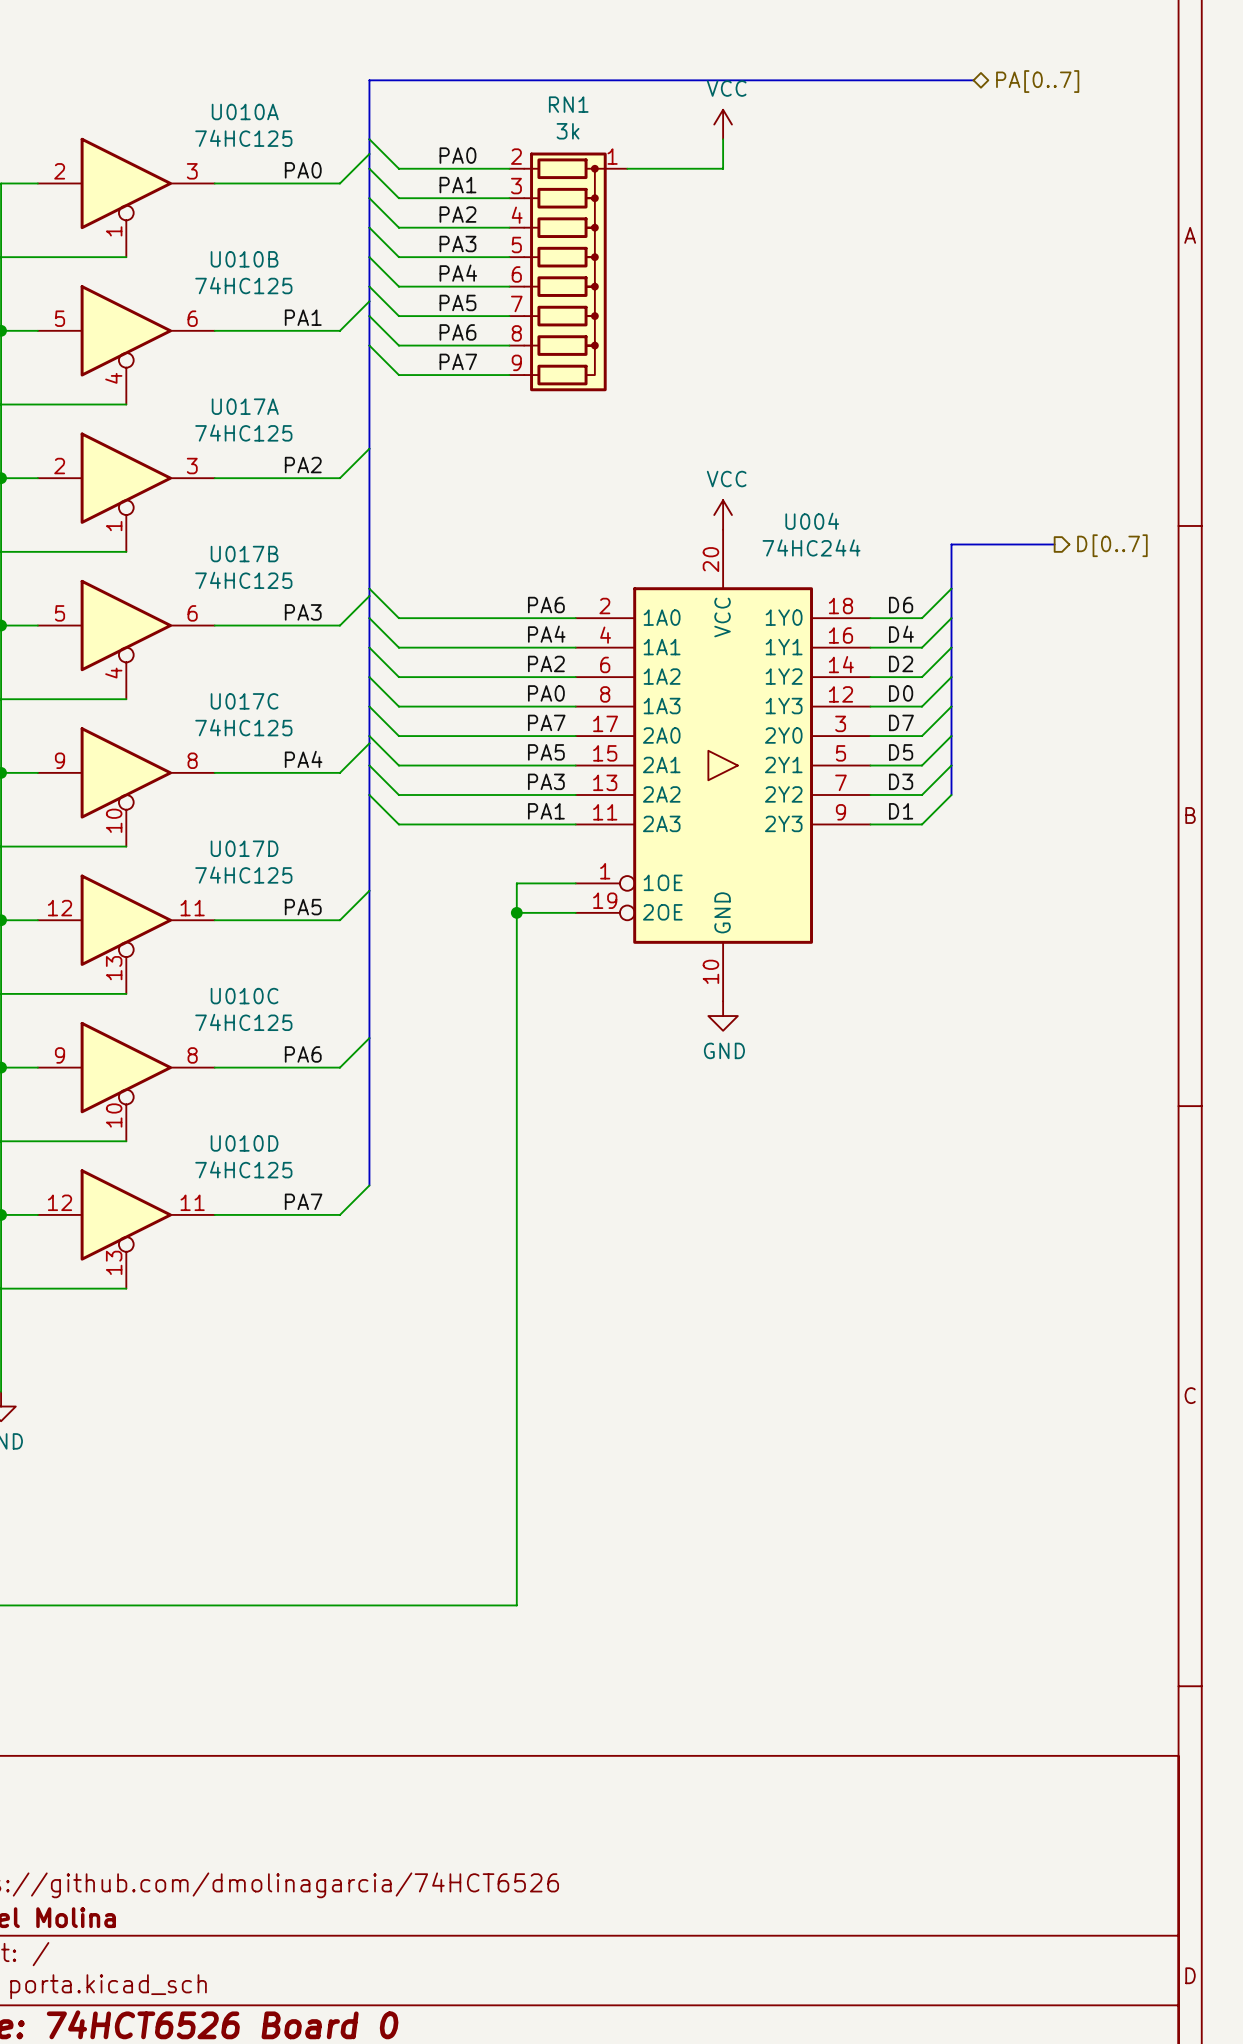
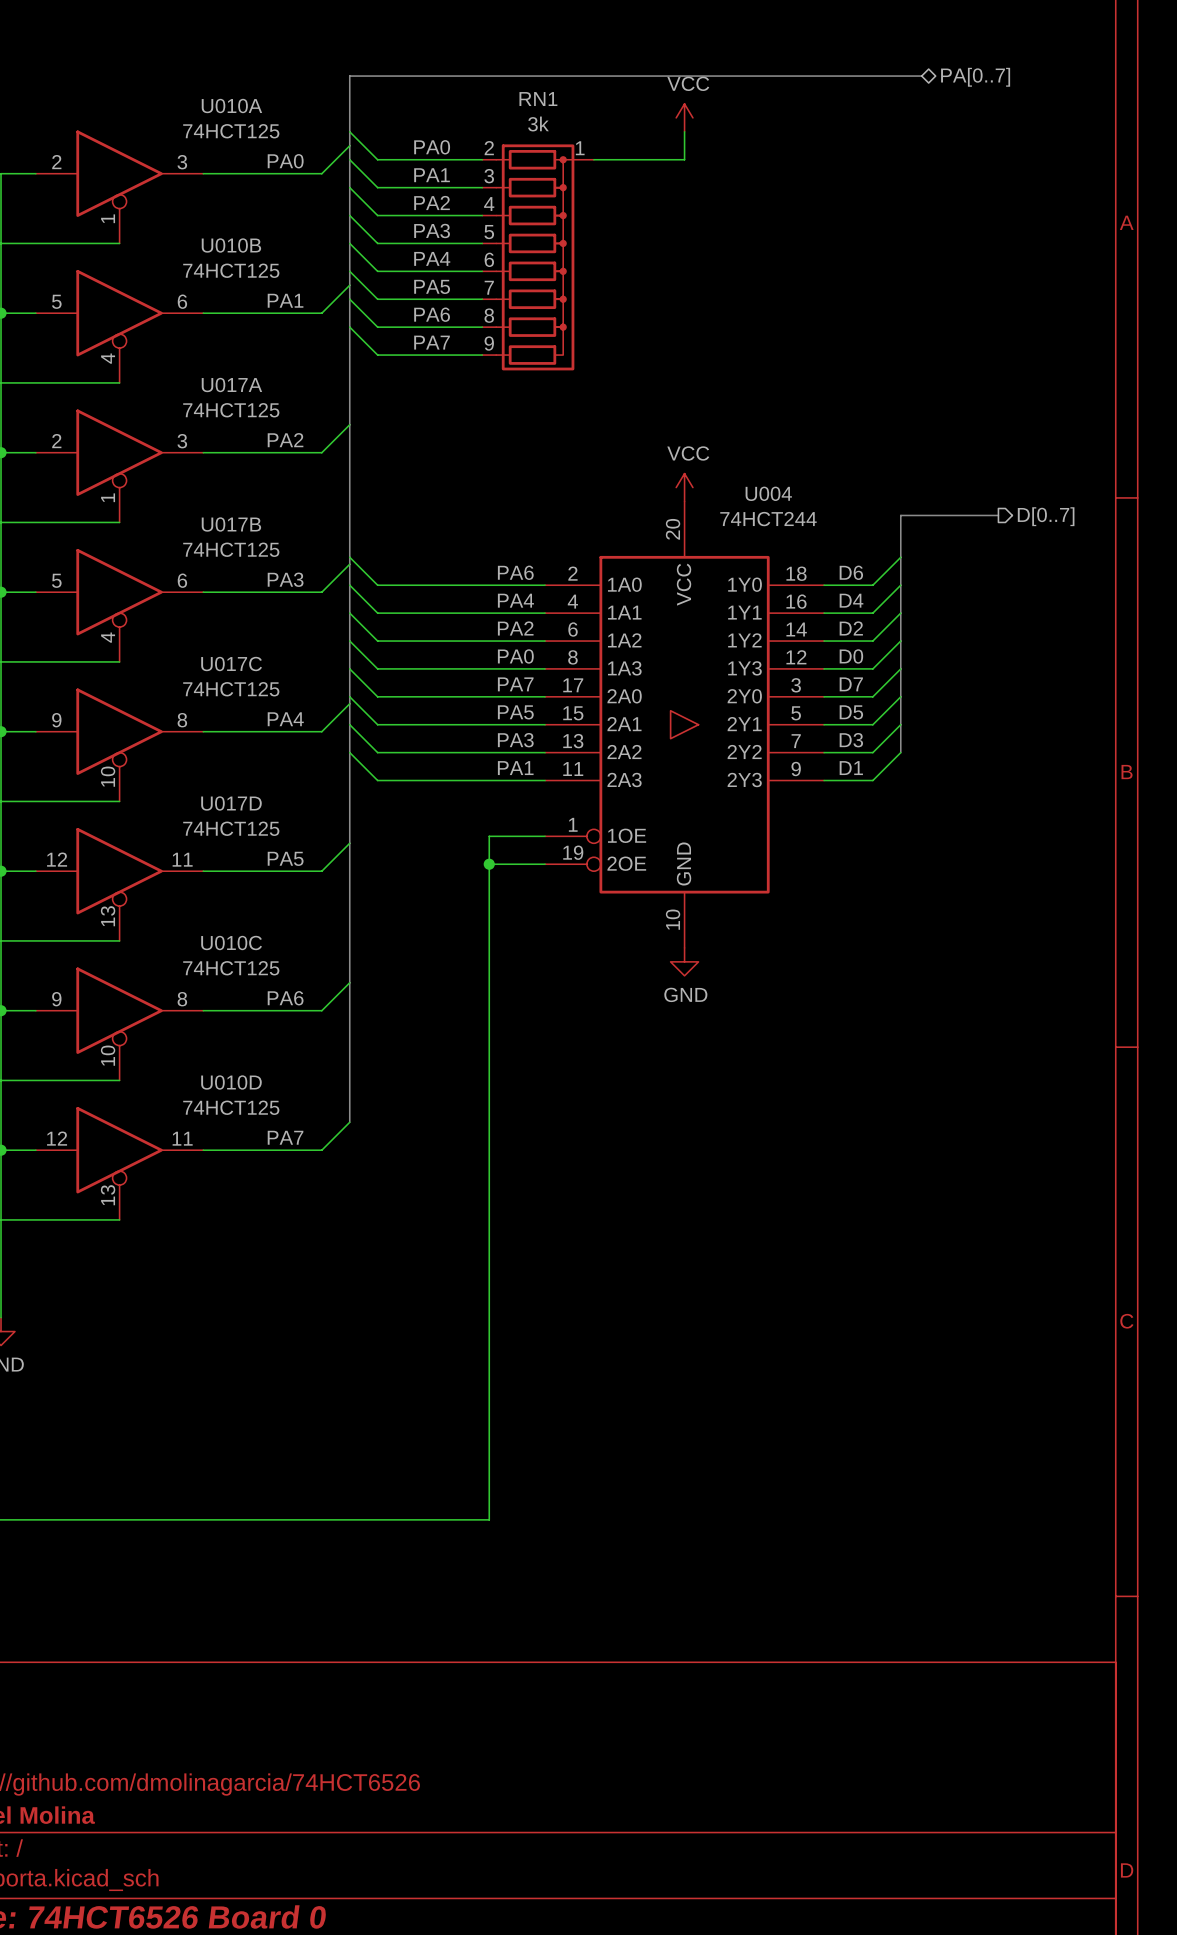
U010A value: 74HC125 (243, 138) -> 74HCT125 (231, 131)
U010B value: 74HC125 (243, 285) -> 74HCT125 (231, 270)
U017A value: 74HC125 (243, 433) -> 74HCT125 (231, 410)
U004 value: 74HC244 (811, 547) -> 74HCT244 (768, 519)
U017B value: 74HC125 (243, 580) -> 74HCT125 (231, 549)
U017C value: 74HC125 (243, 727) -> 74HCT125 (231, 689)
U017D value: 74HC125 (243, 875) -> 74HCT125 (231, 828)
U010C value: 74HC125 (243, 1022) -> 74HCT125 (231, 968)
U010D value: 74HC125 (243, 1169) -> 74HCT125 (231, 1107)

